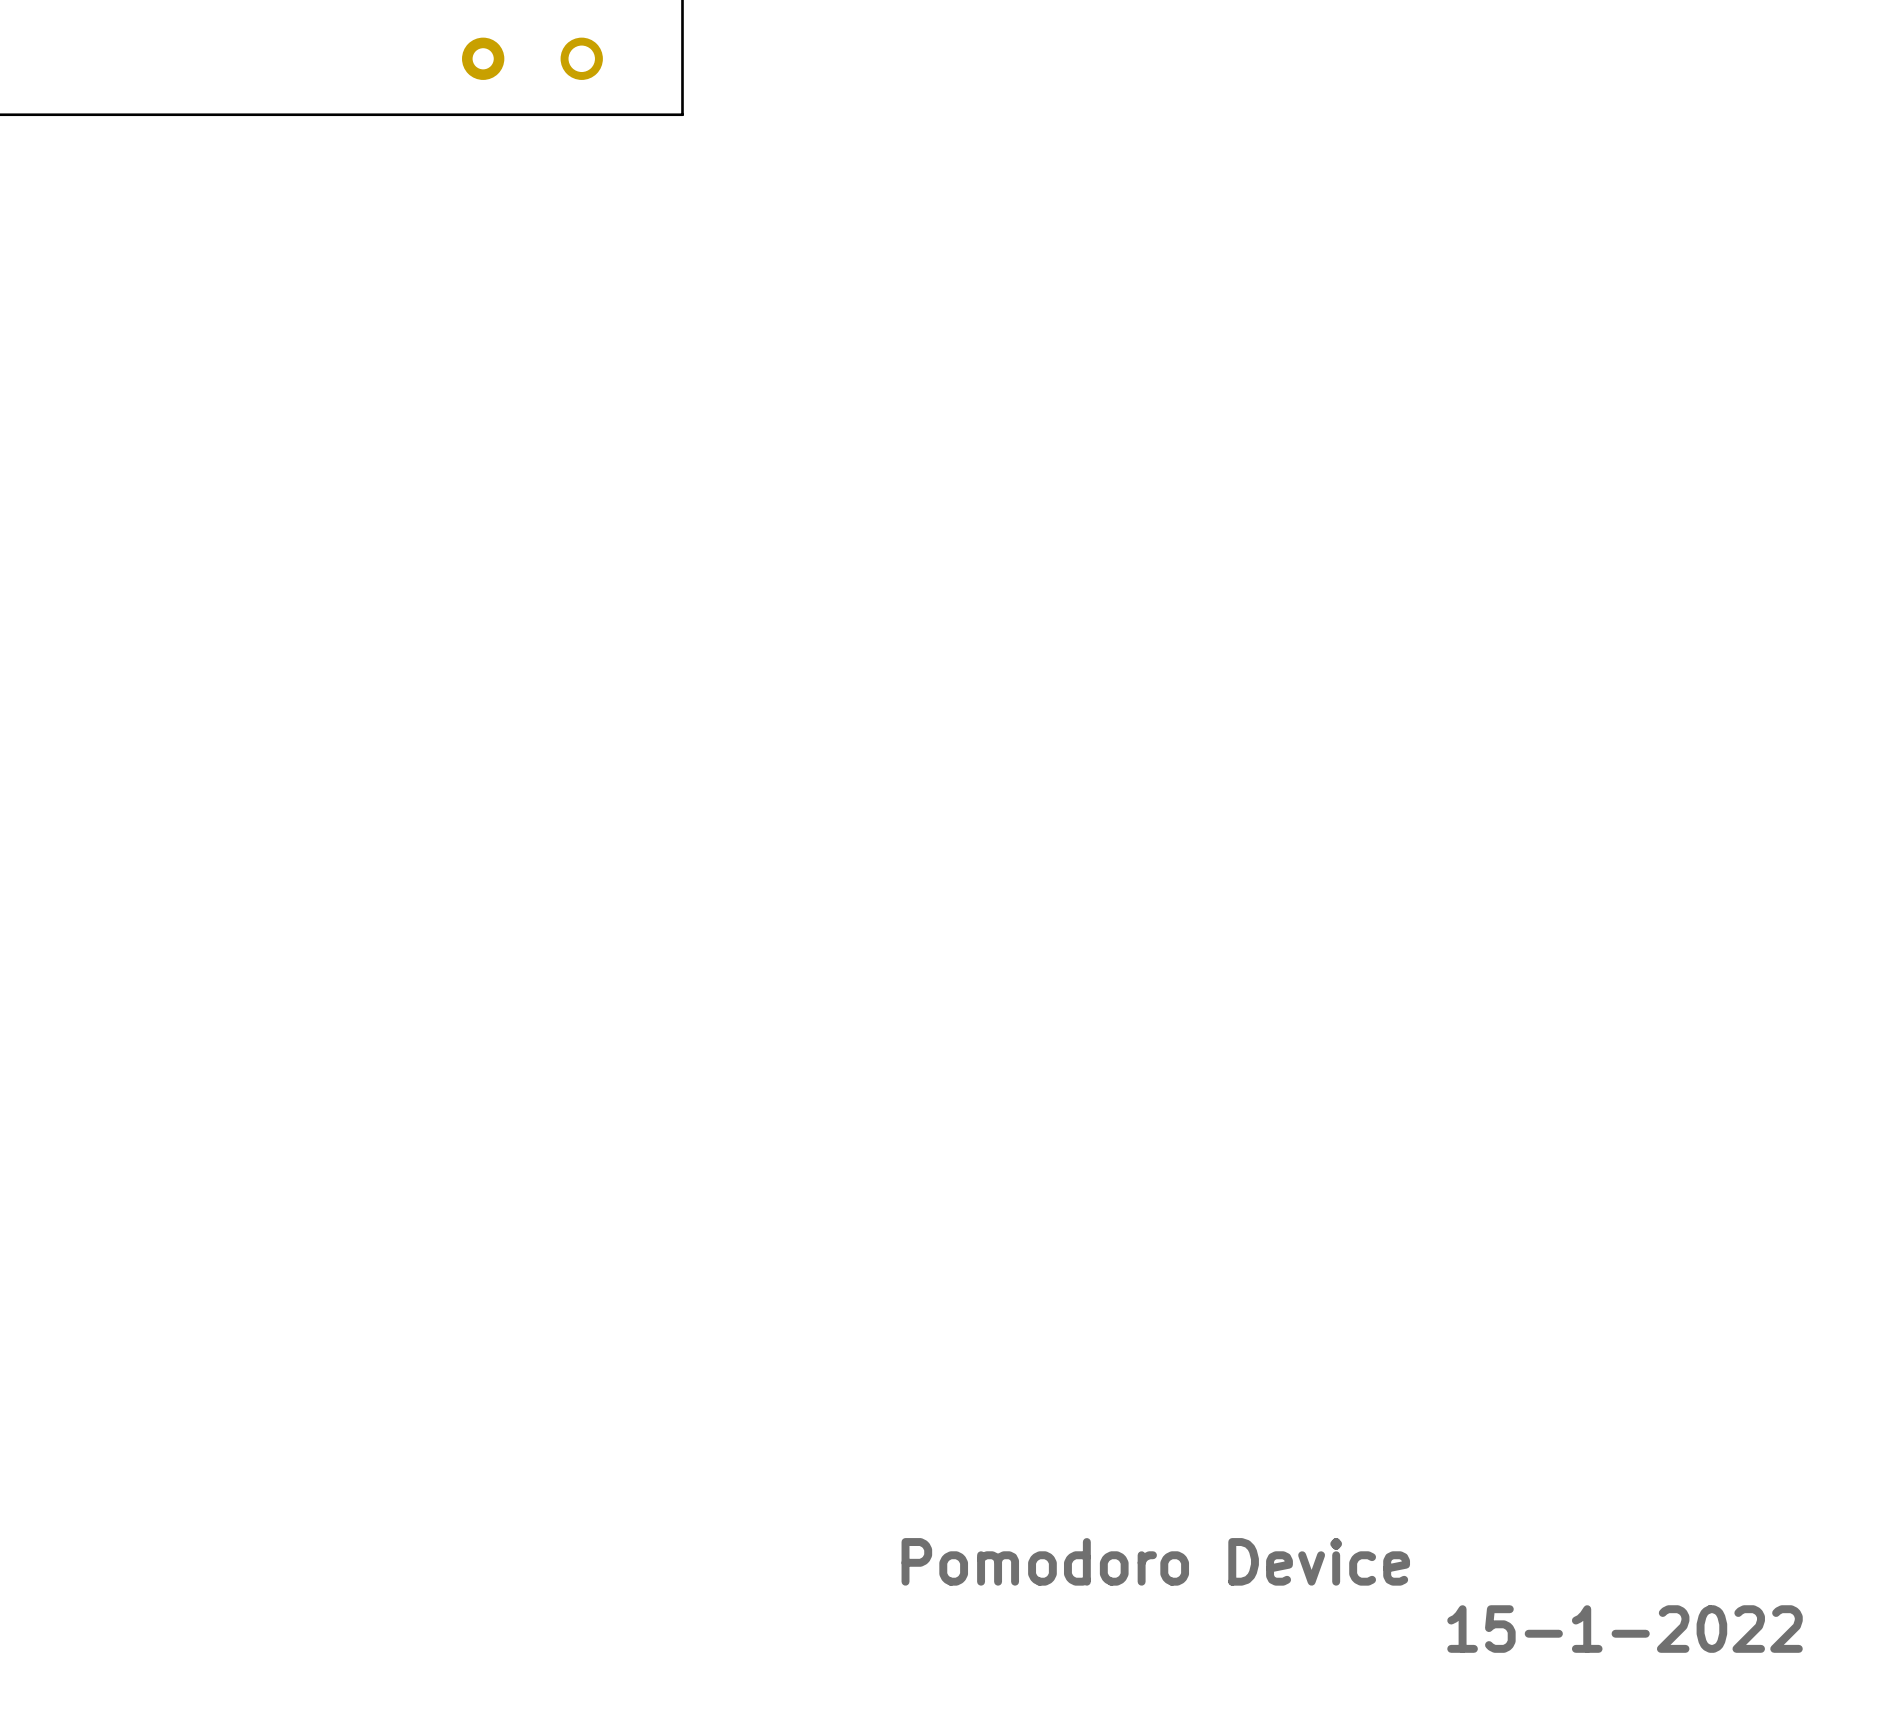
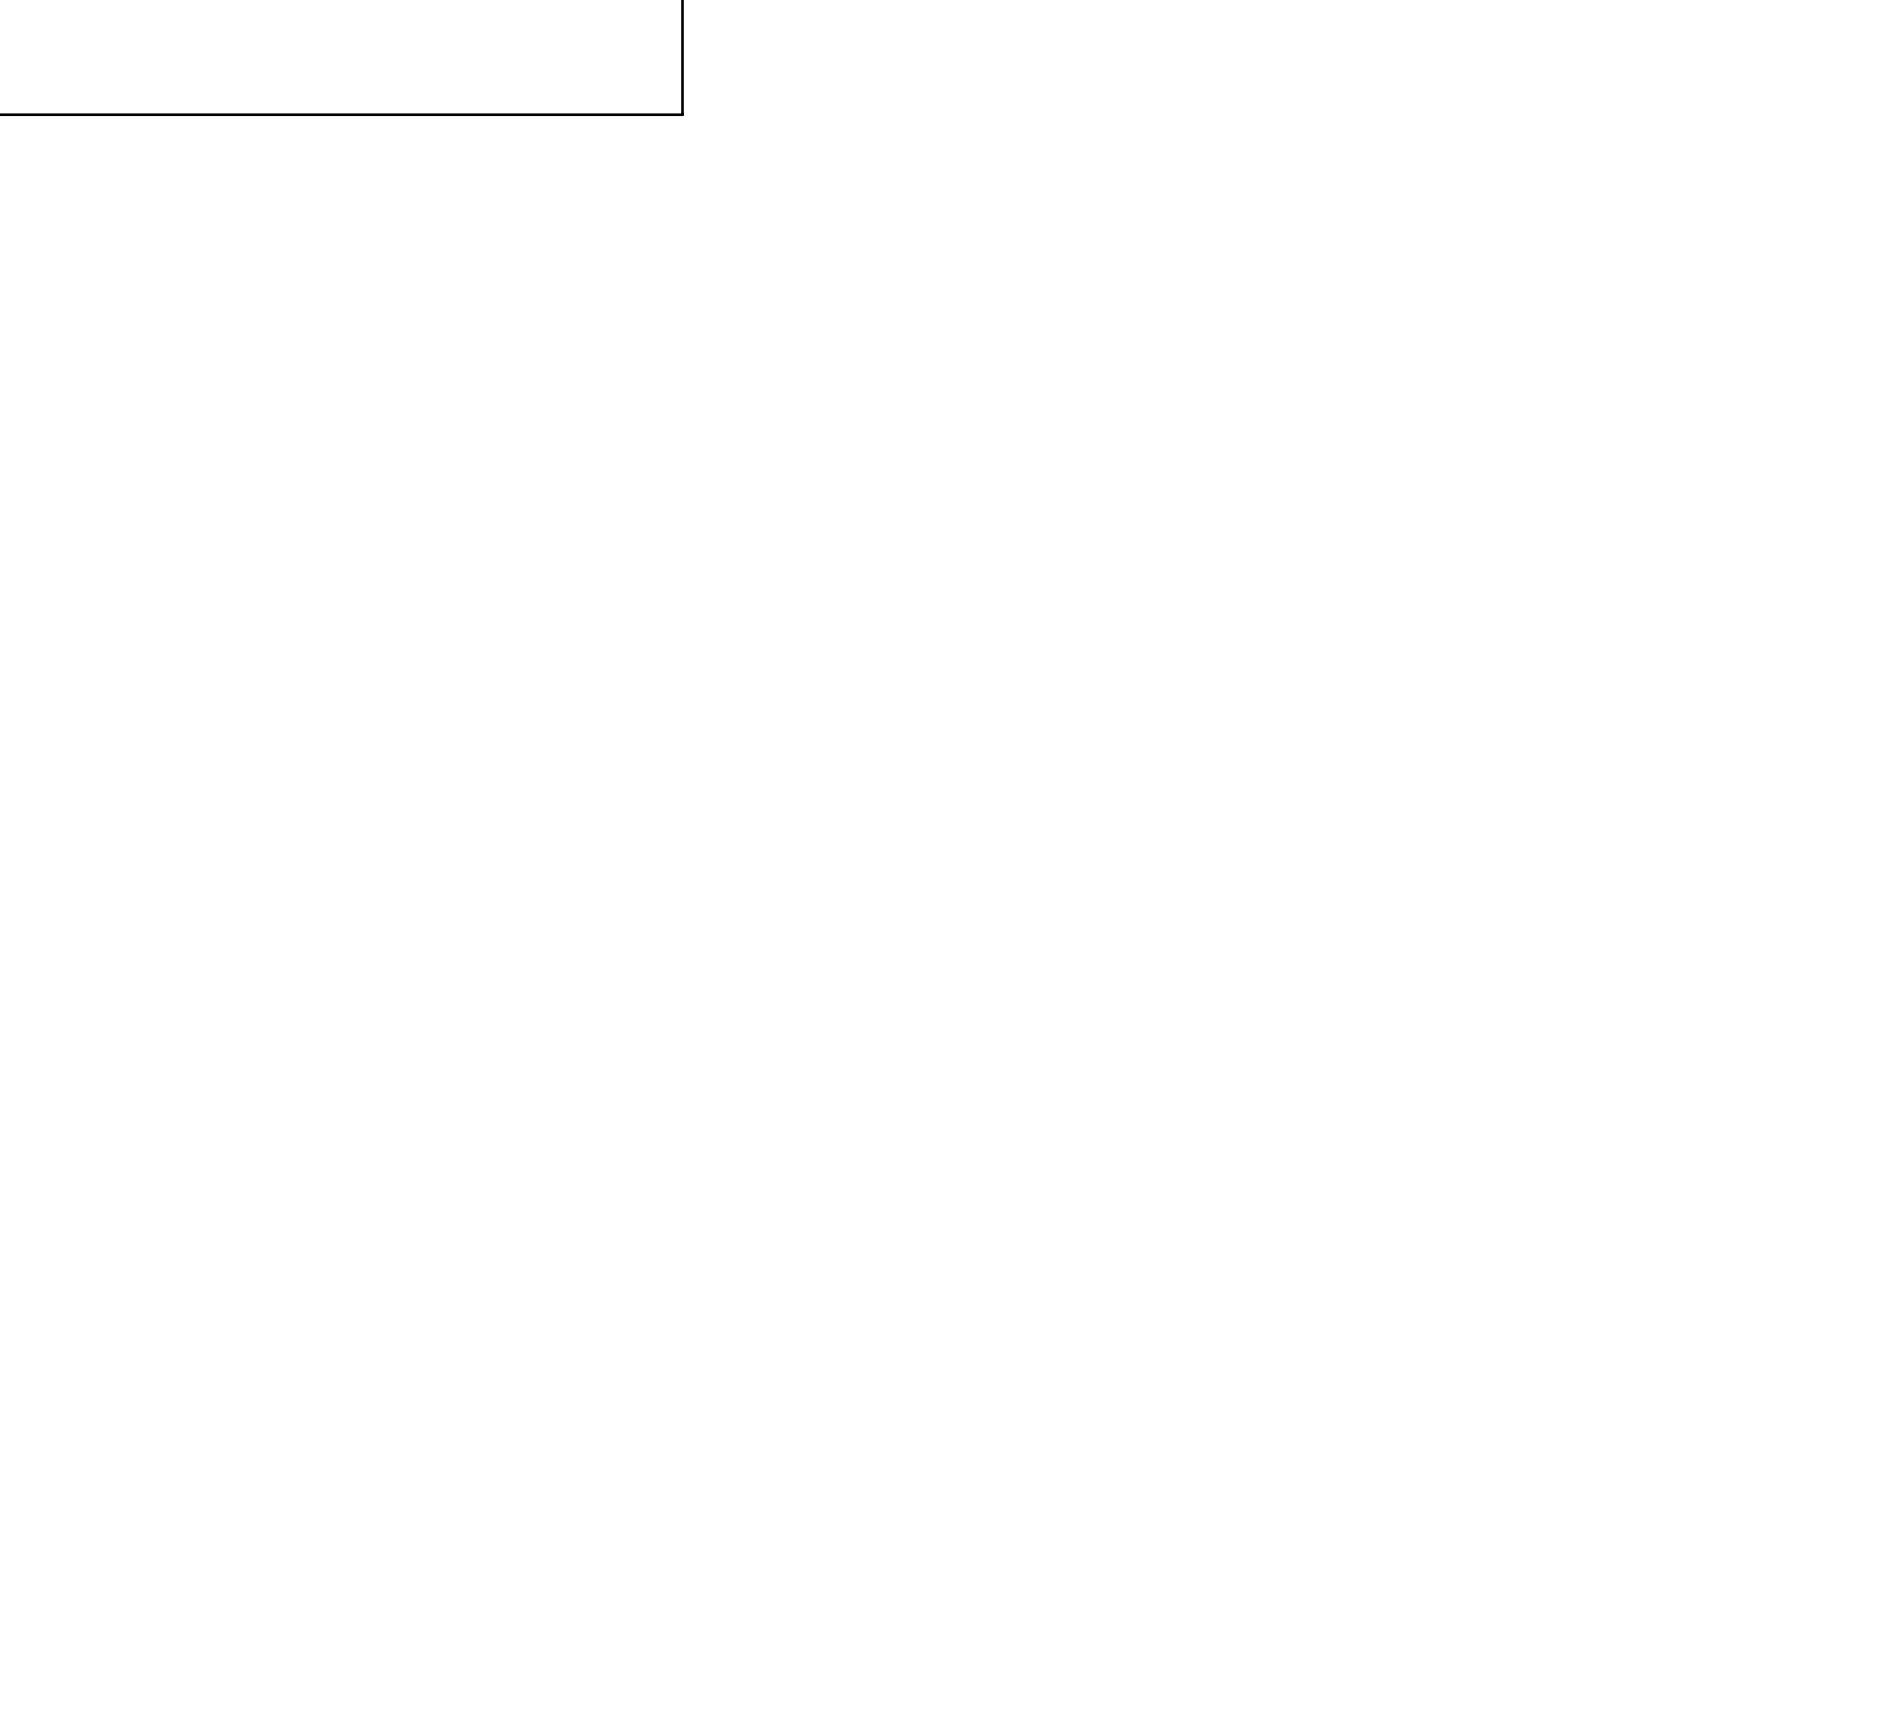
part: (483, 58) -> none
part: (581, 58) -> none
text: Pomodoro Device (1155, 1561) -> none
text: 15-1-2022 (1625, 1629) -> none

